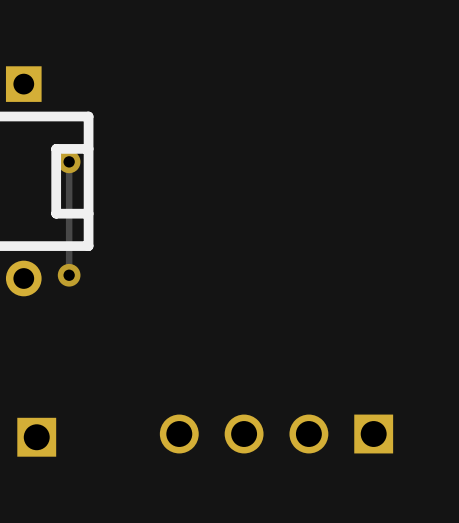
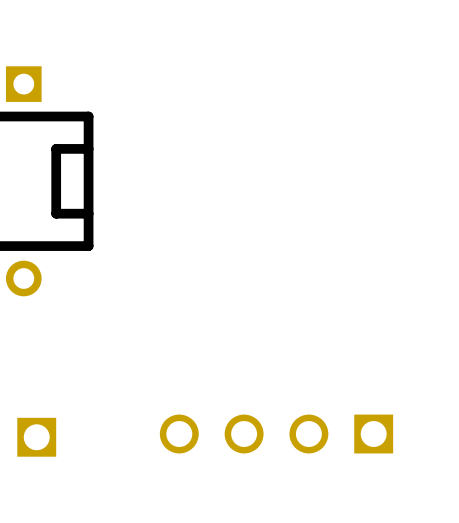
track: (69, 161) (69, 275) -> none
via: (69, 161) -> none
via: (69, 275) -> none

